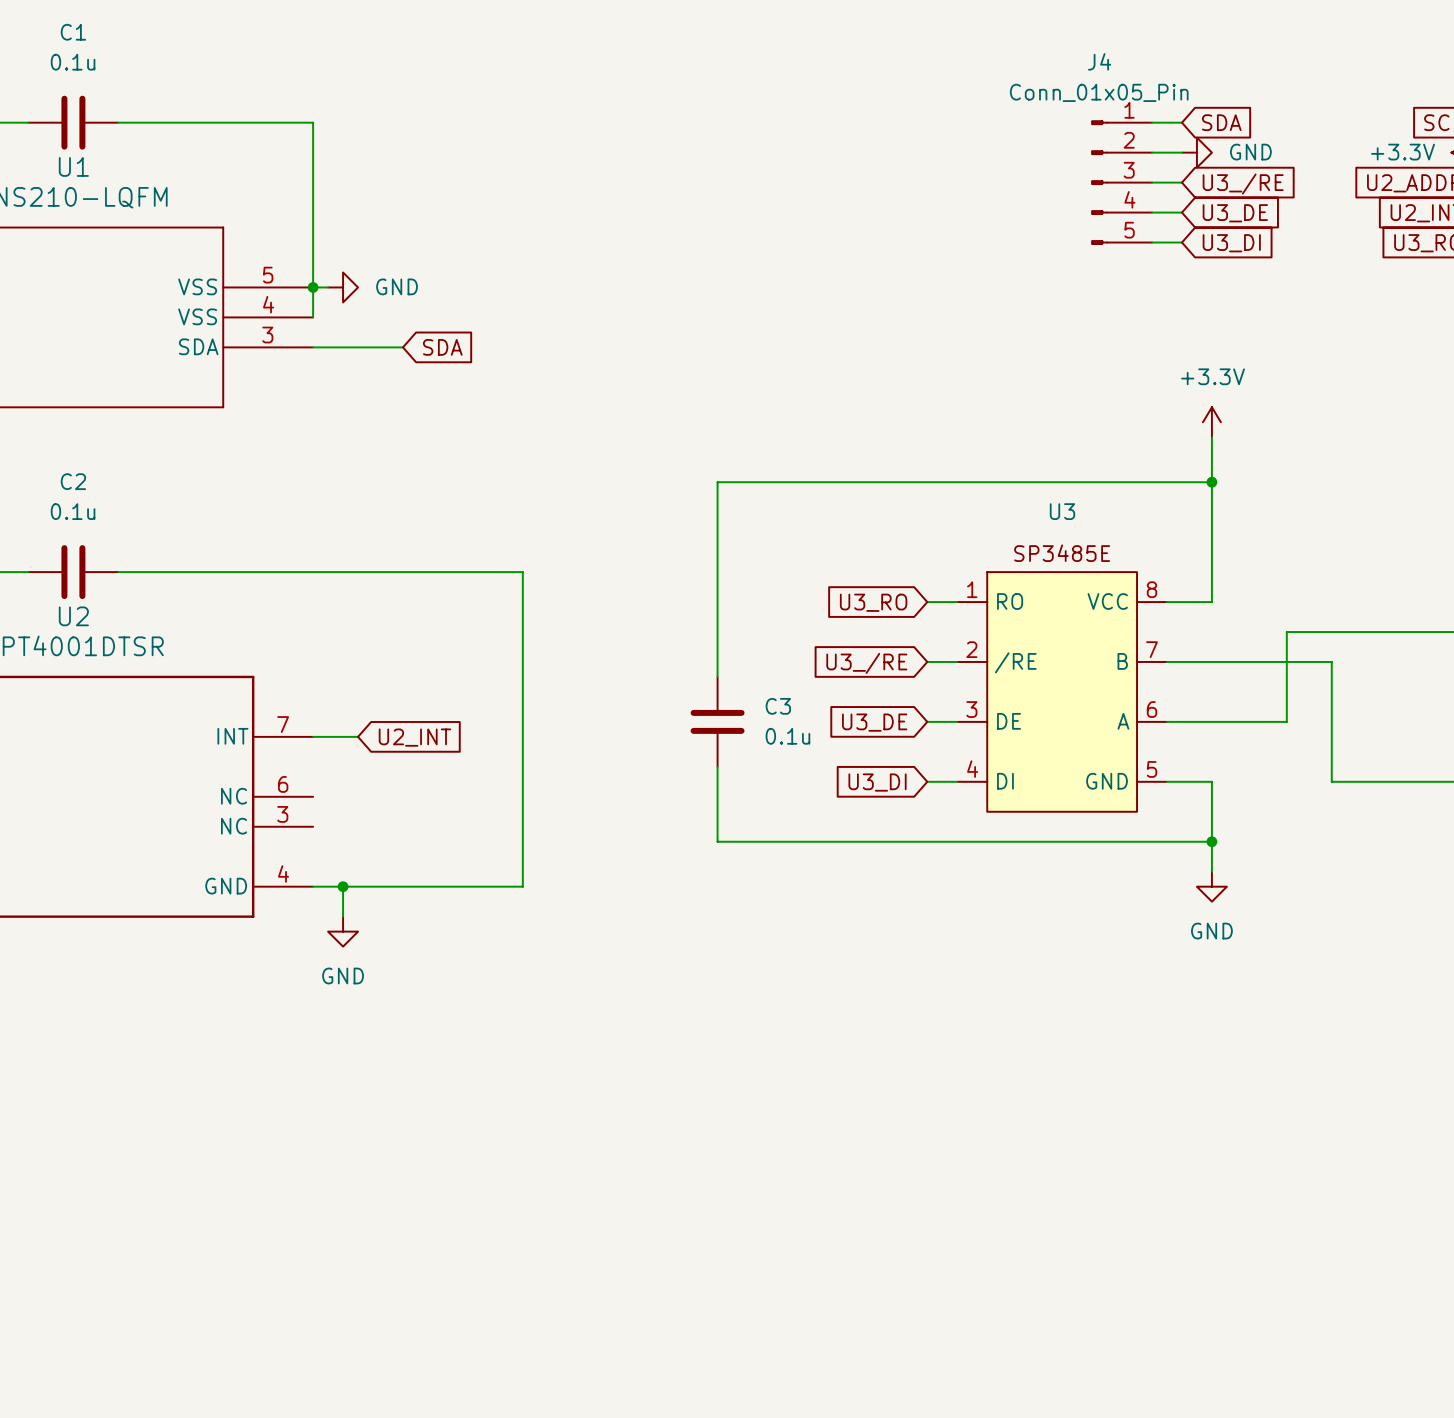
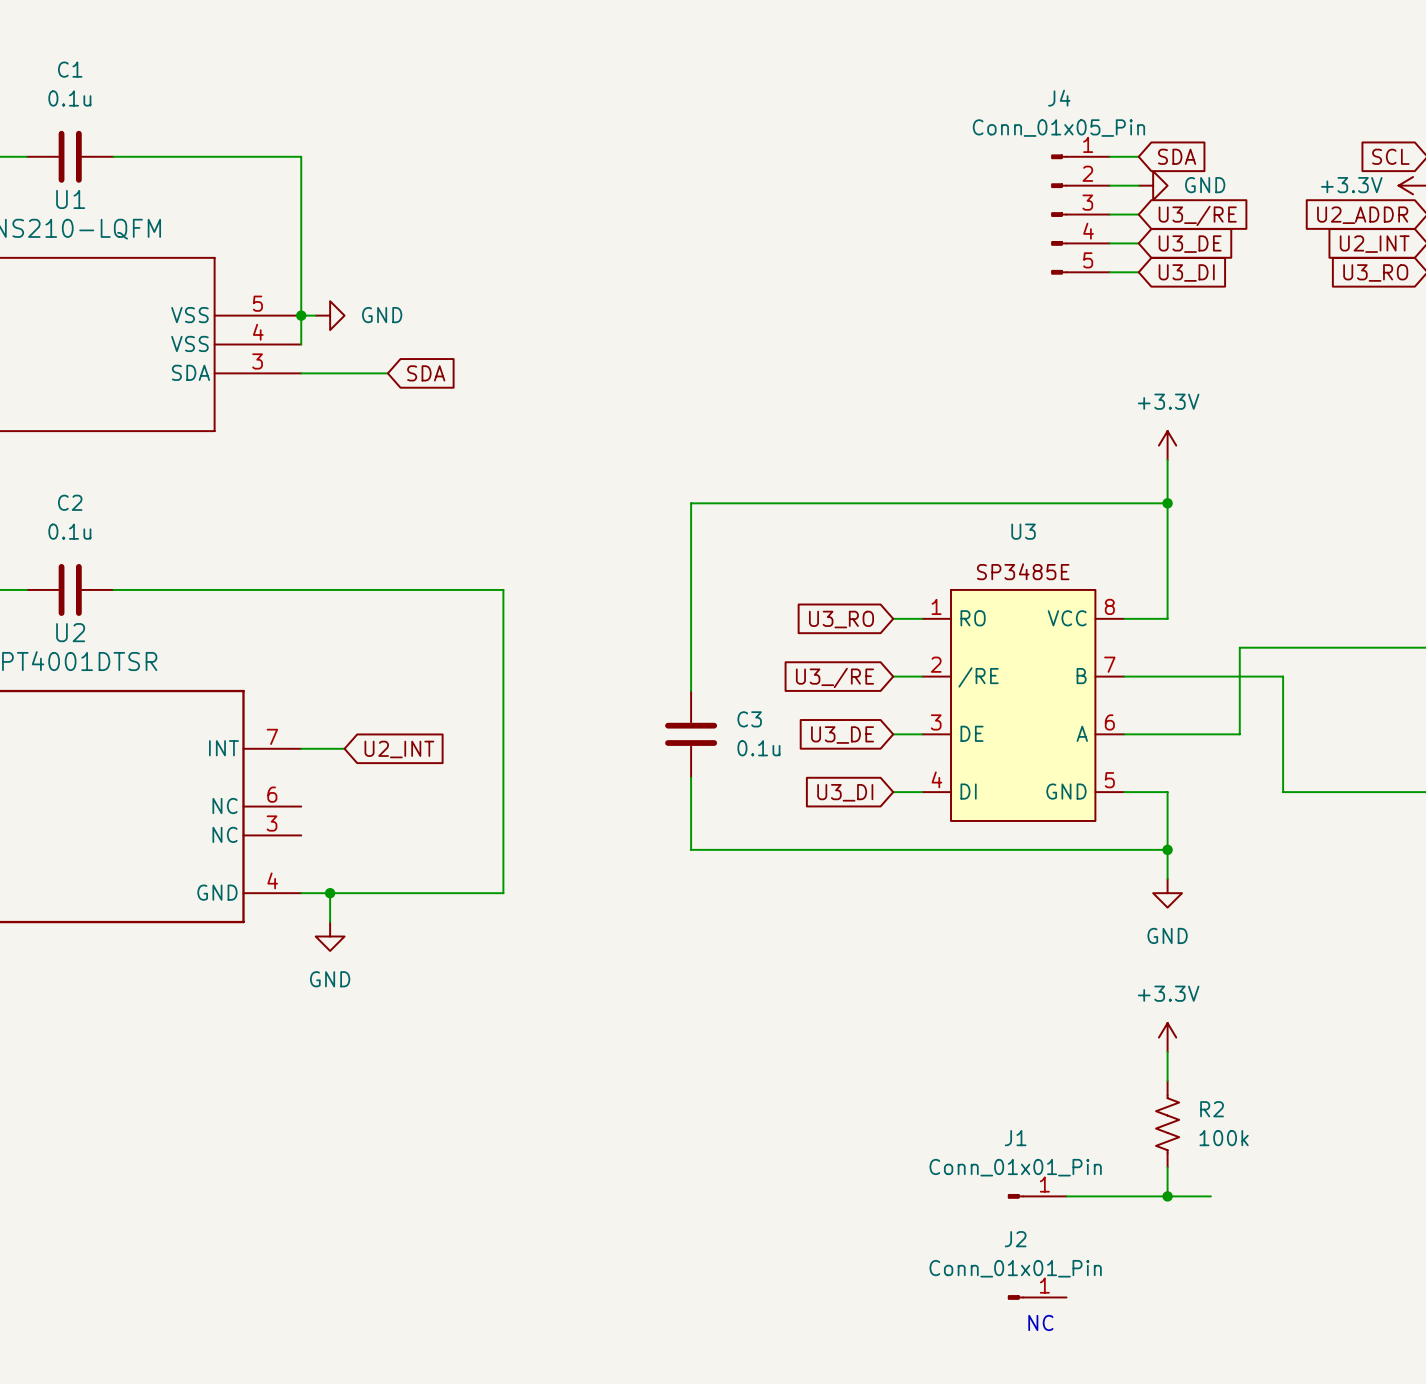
power symbol: none -> +3.3V (1167, 1037)
wire: none -> (1167, 1052) (1167, 1080)
R2: none -> 100k (1167, 1124)
wire: none -> (1167, 1167) (1167, 1196)
J1: none -> Conn_01x01_Pin (1037, 1196)
wire: none -> (1066, 1196) (1210, 1196)
junction: none -> (1167, 1196)
J2: none -> Conn_01x01_Pin (1037, 1297)
text: none -> NC (1040, 1322)

